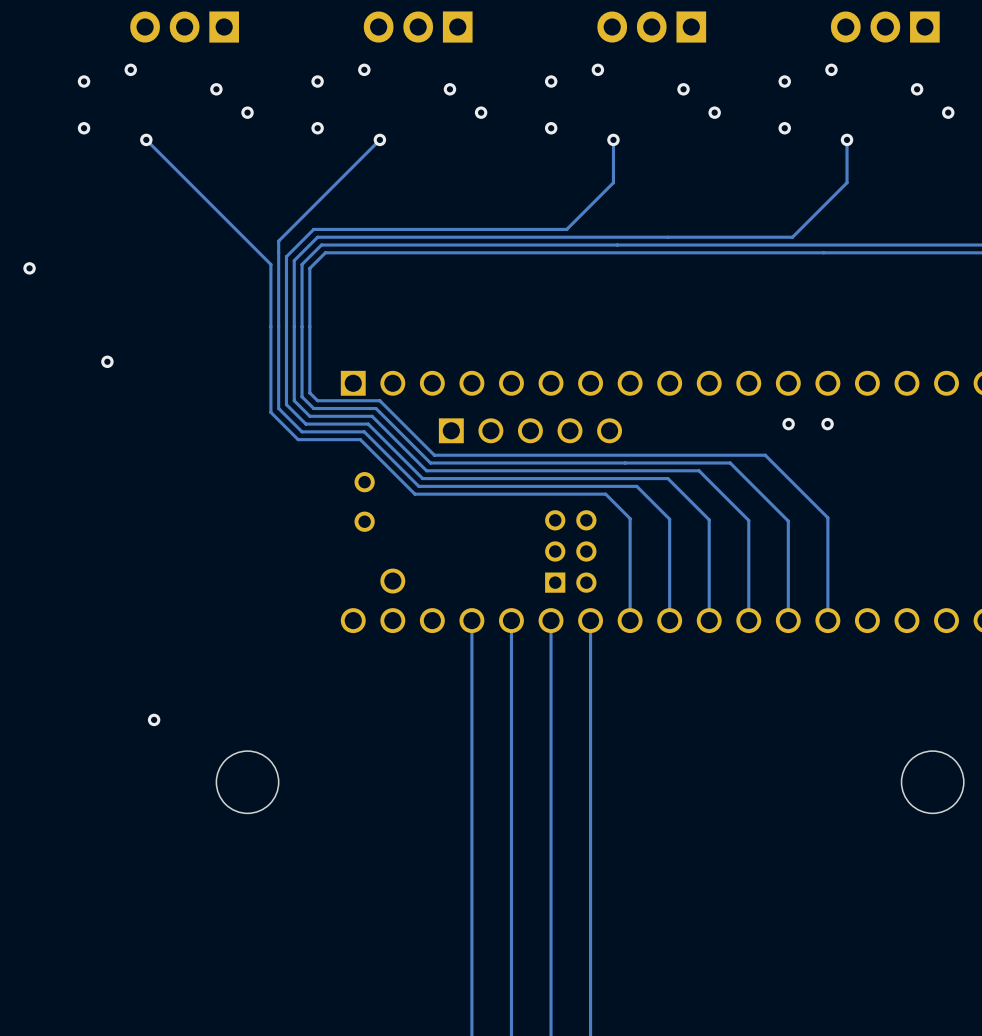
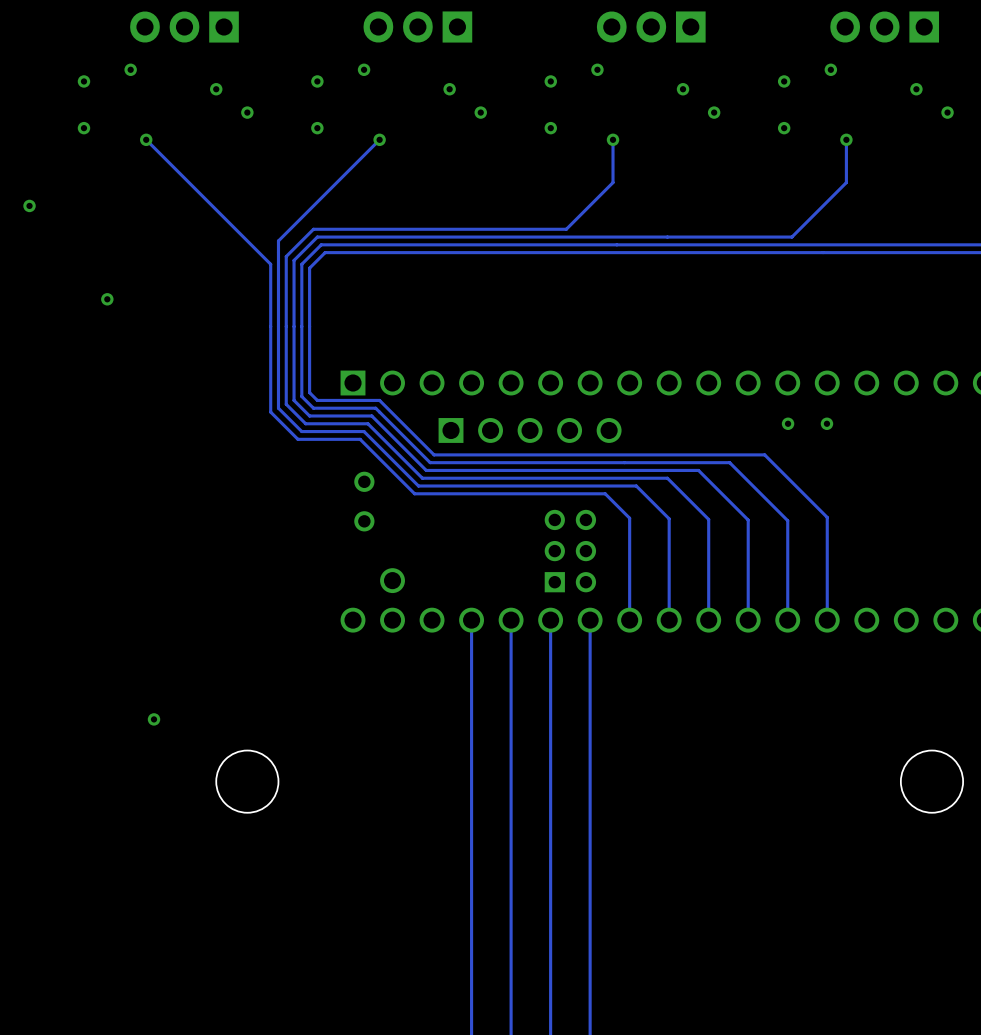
via: none -> (29, 205)
via: (29, 268) -> none
via: none -> (107, 299)
via: (107, 361) -> none

